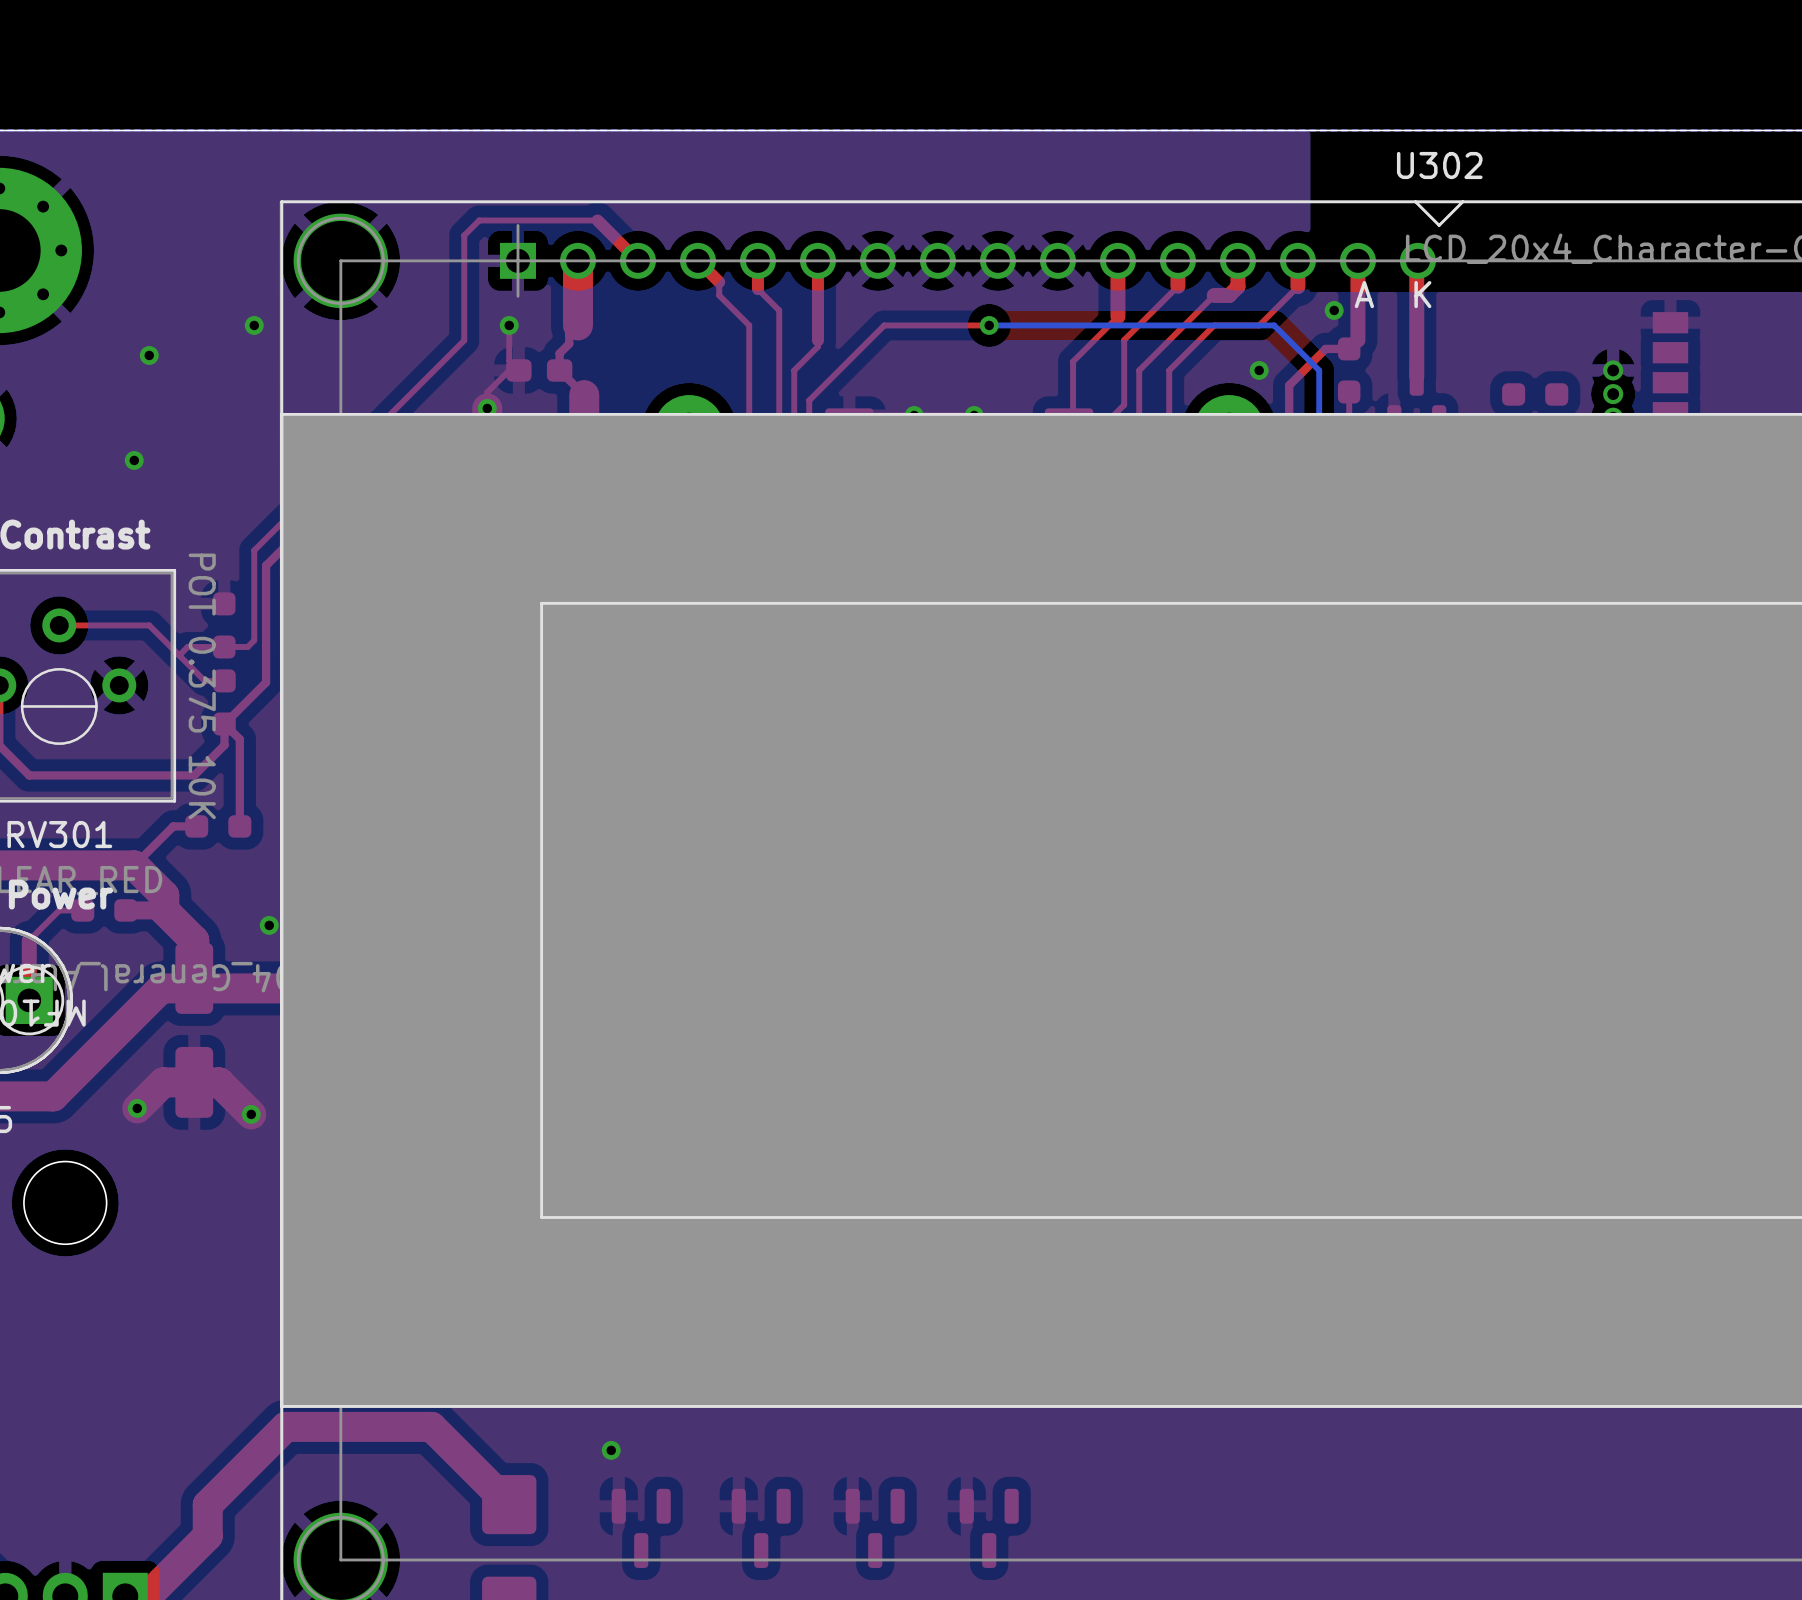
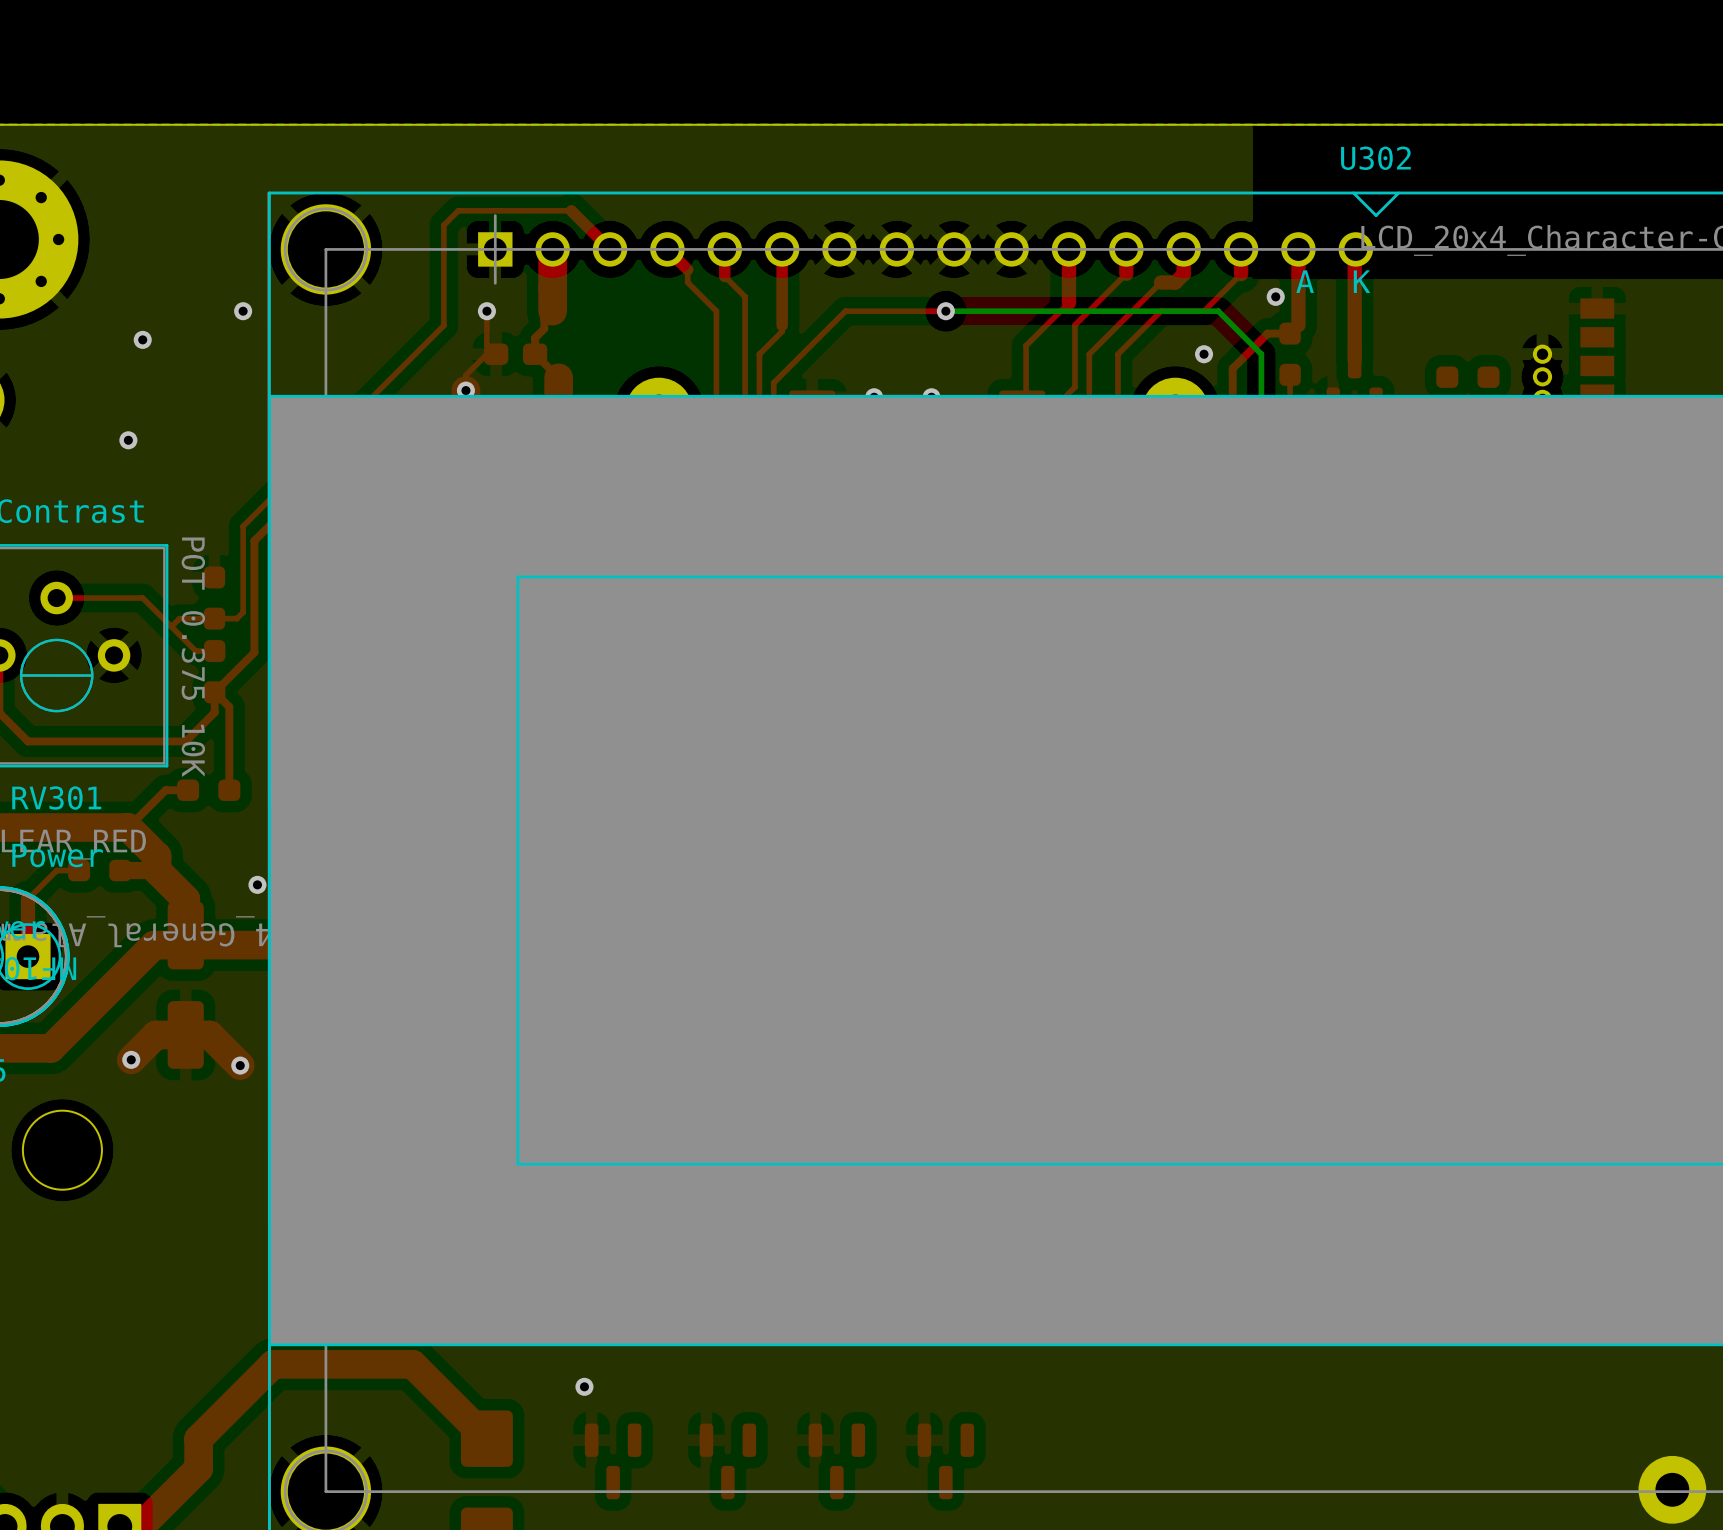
part: none -> (1672, 1489)

